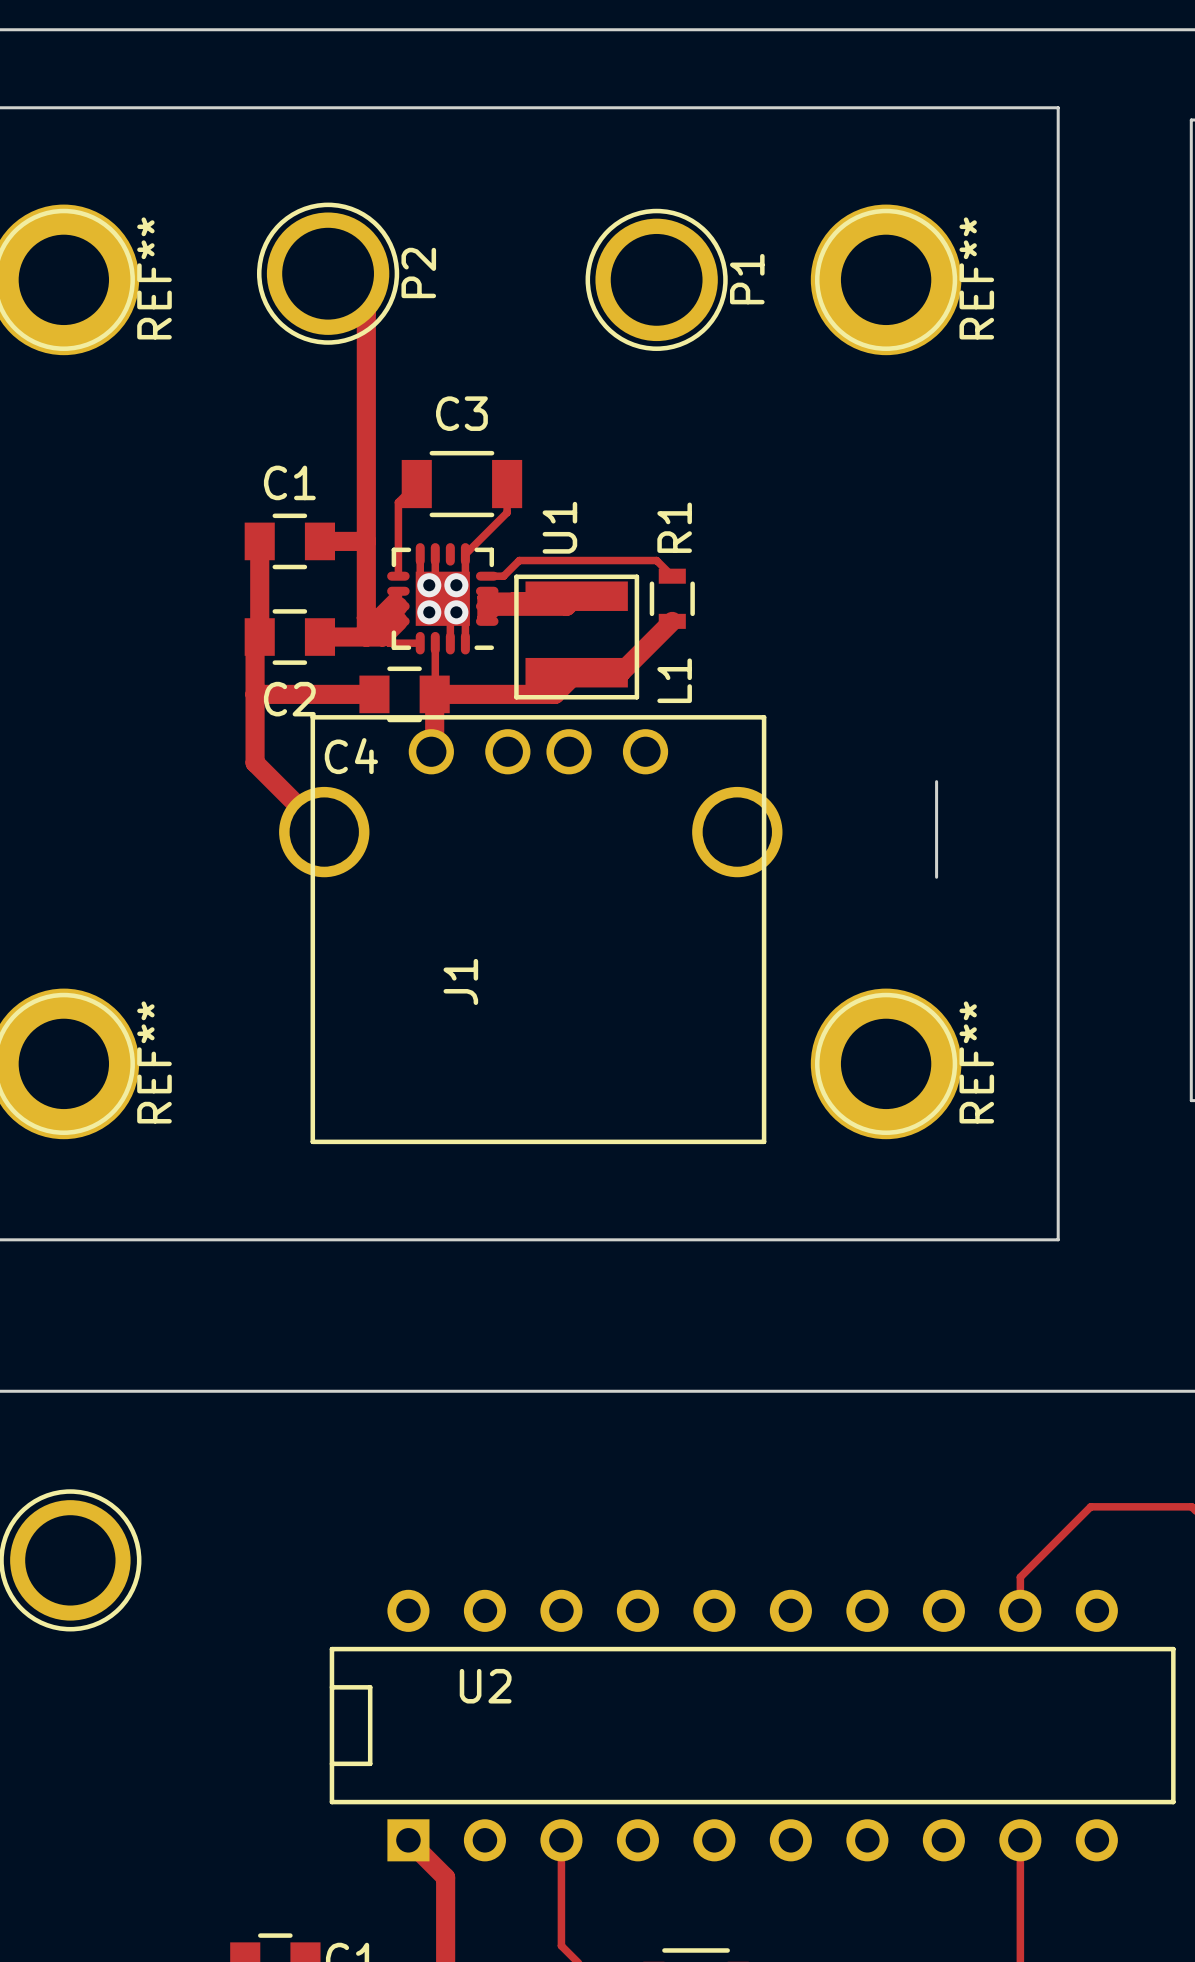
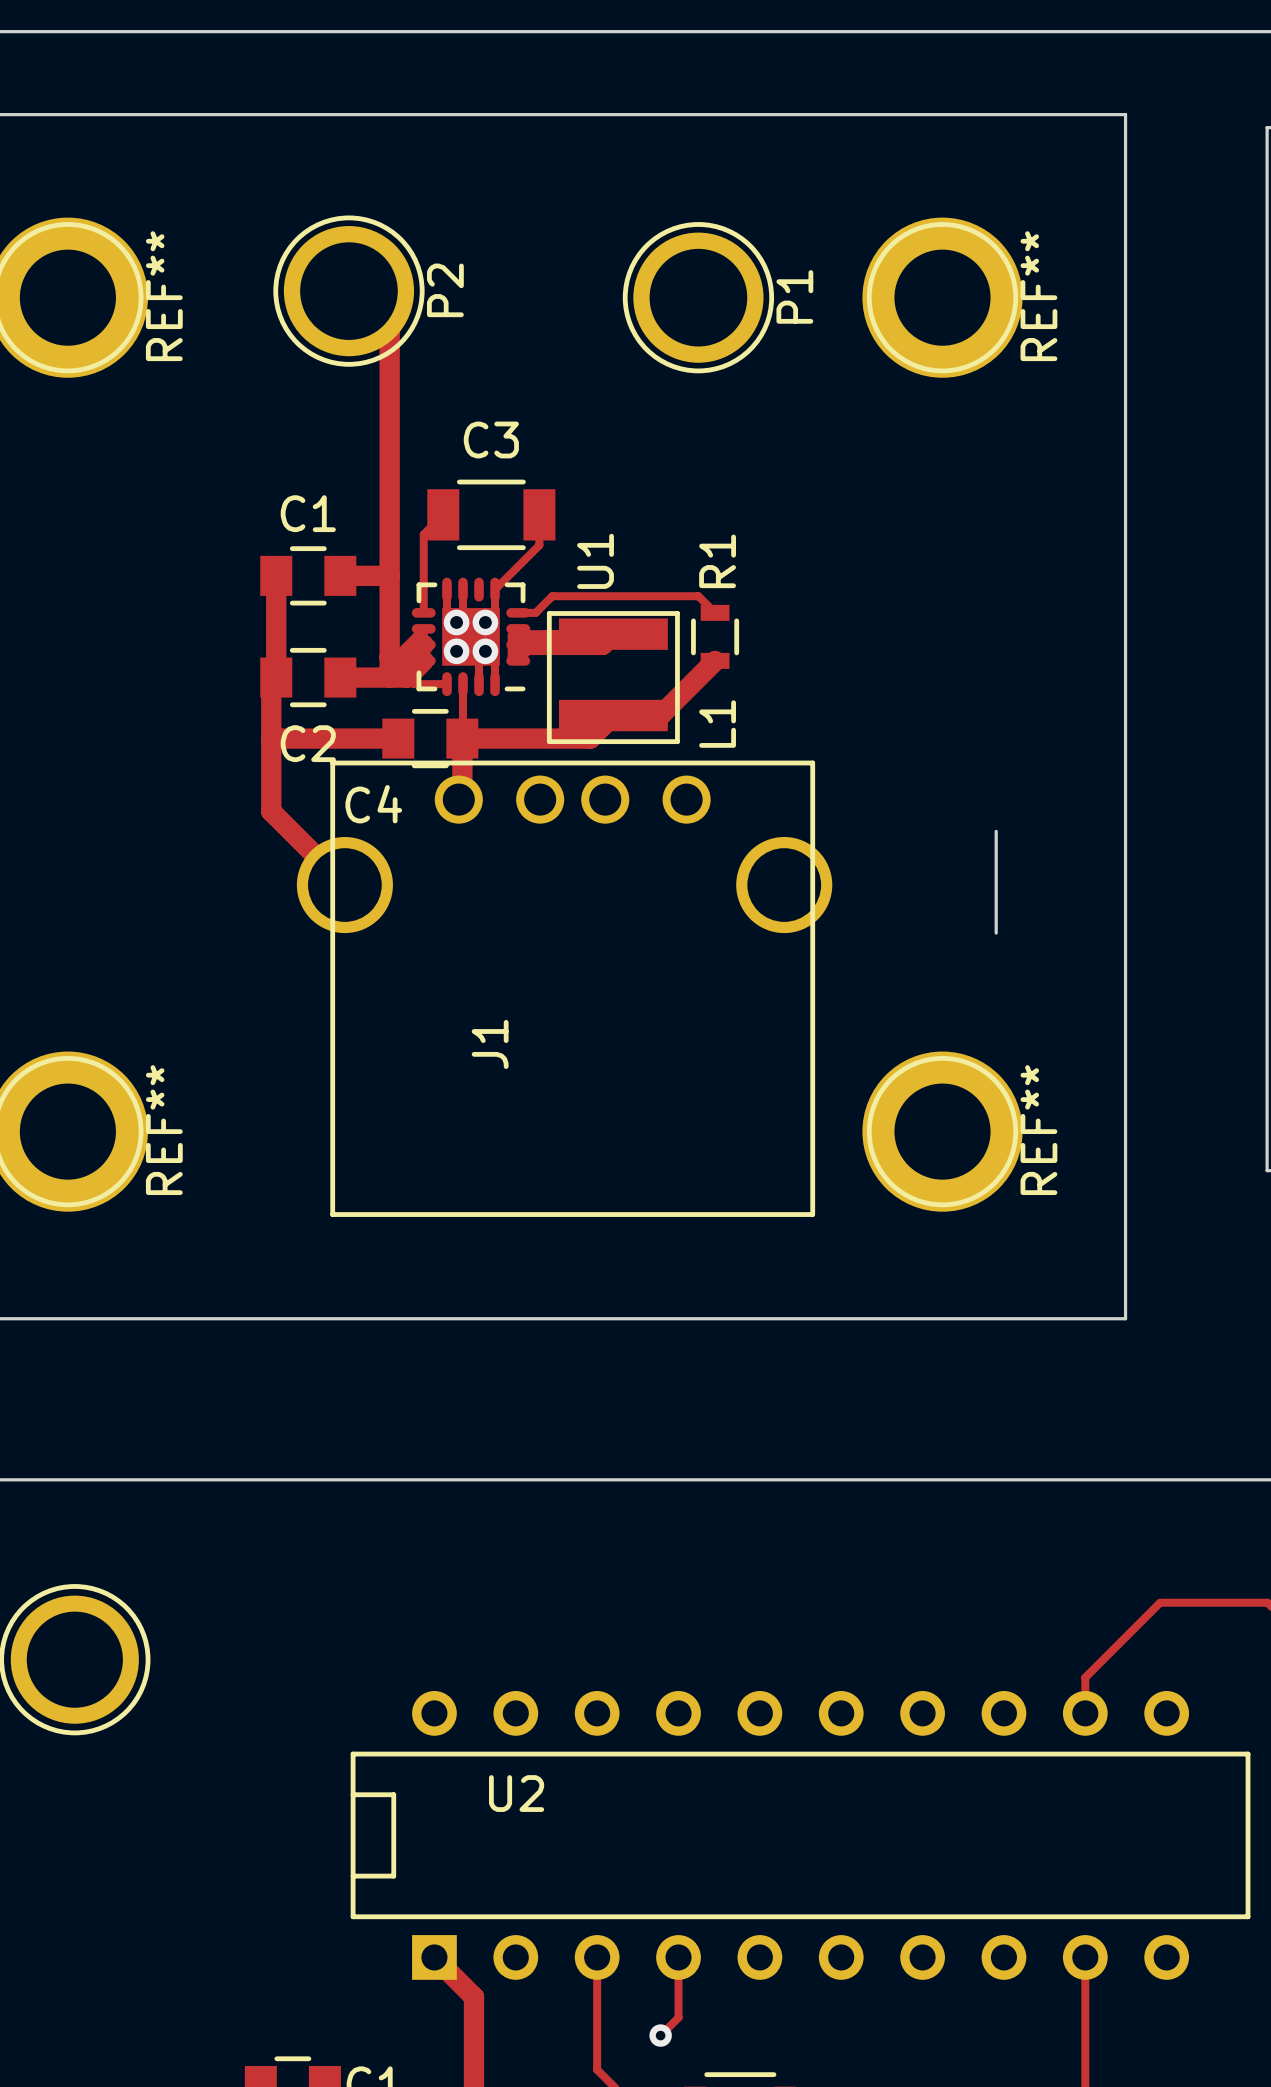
track: none -> (678, 1957) (678, 2017) (660, 2035)
via: none -> (660, 2035)

